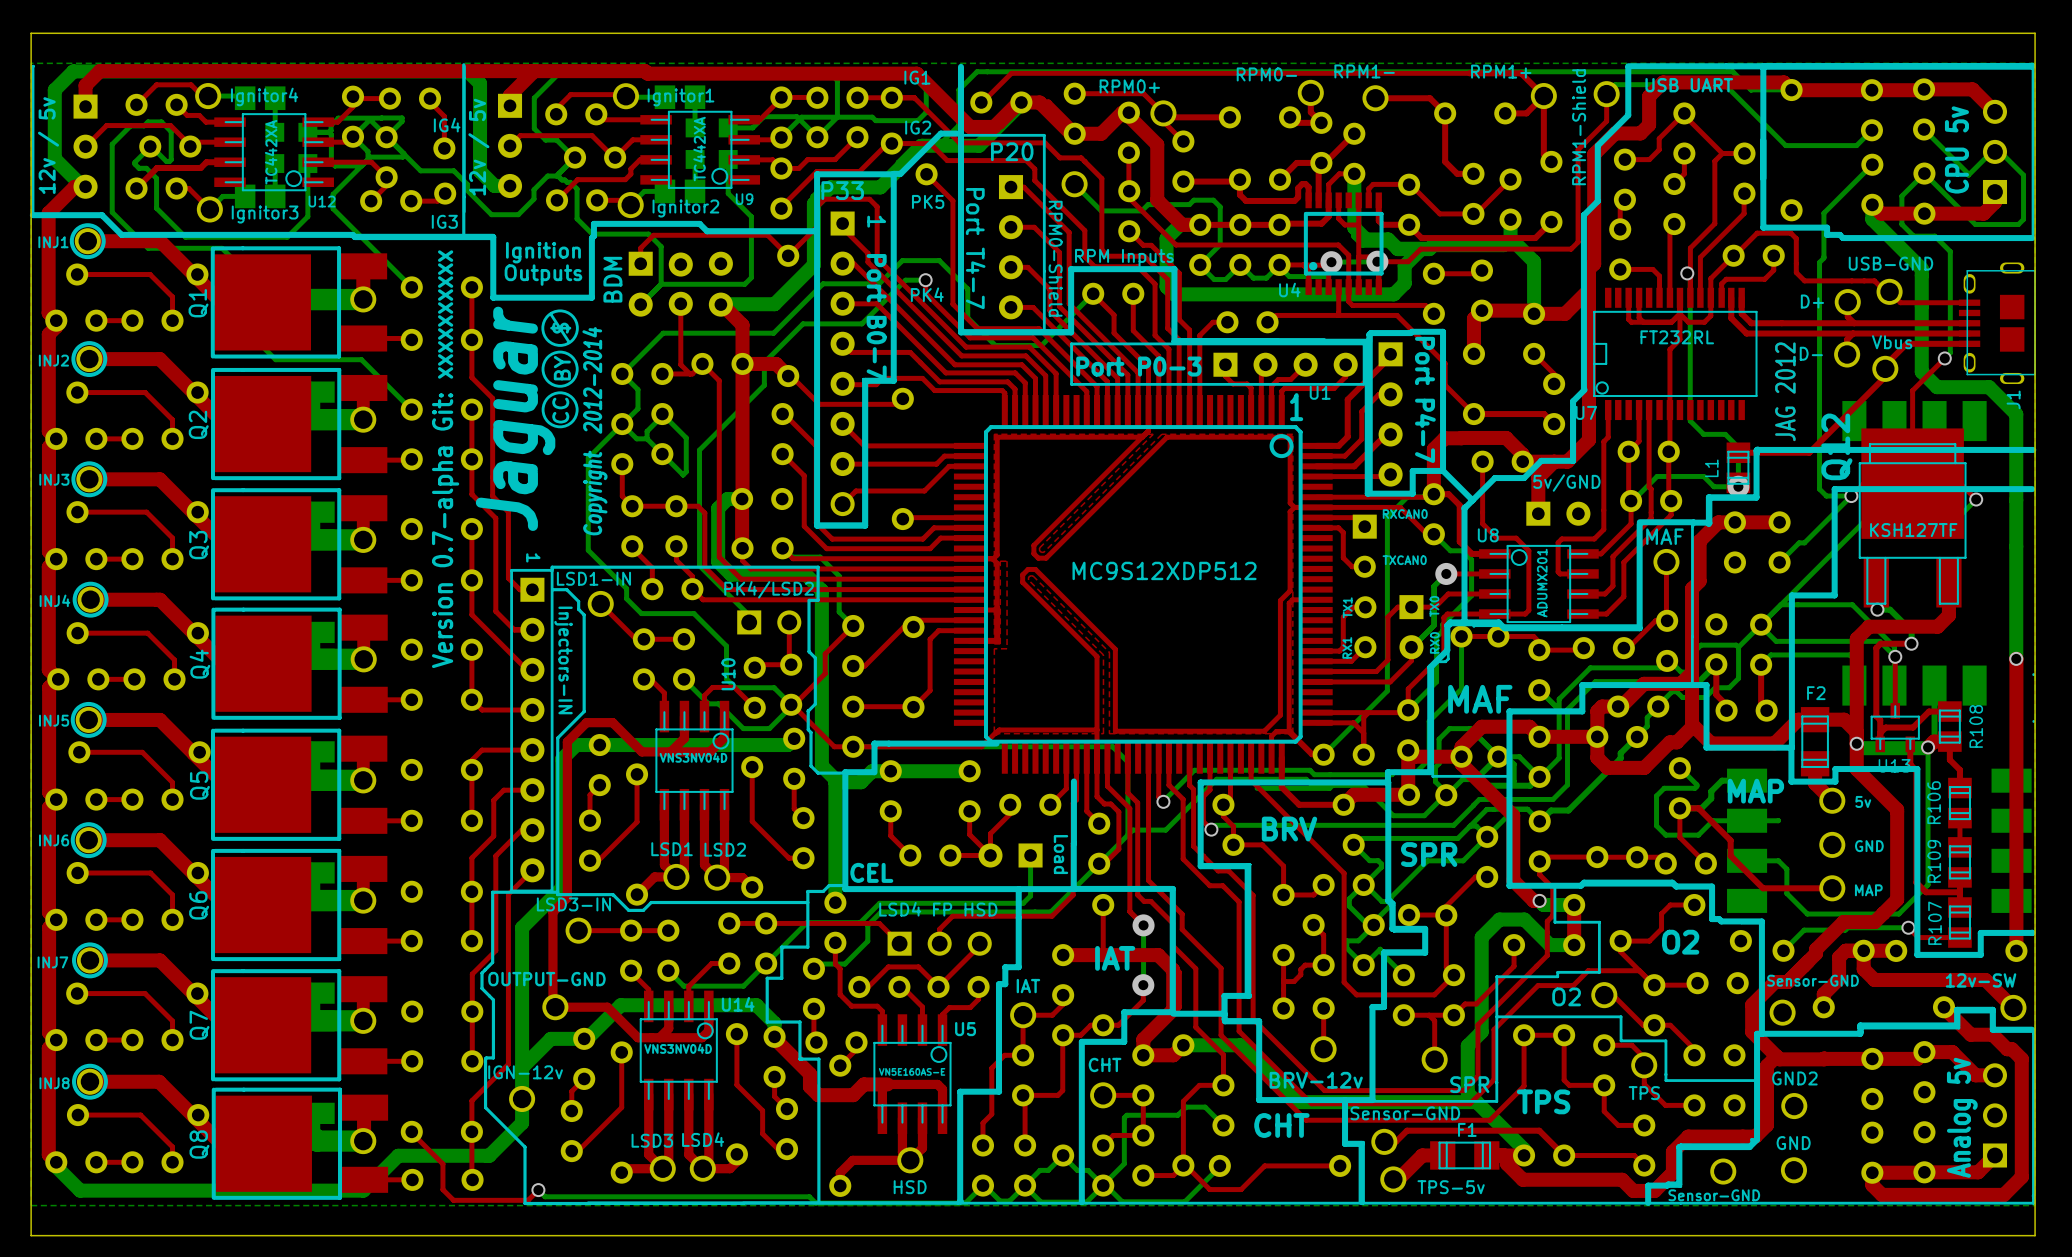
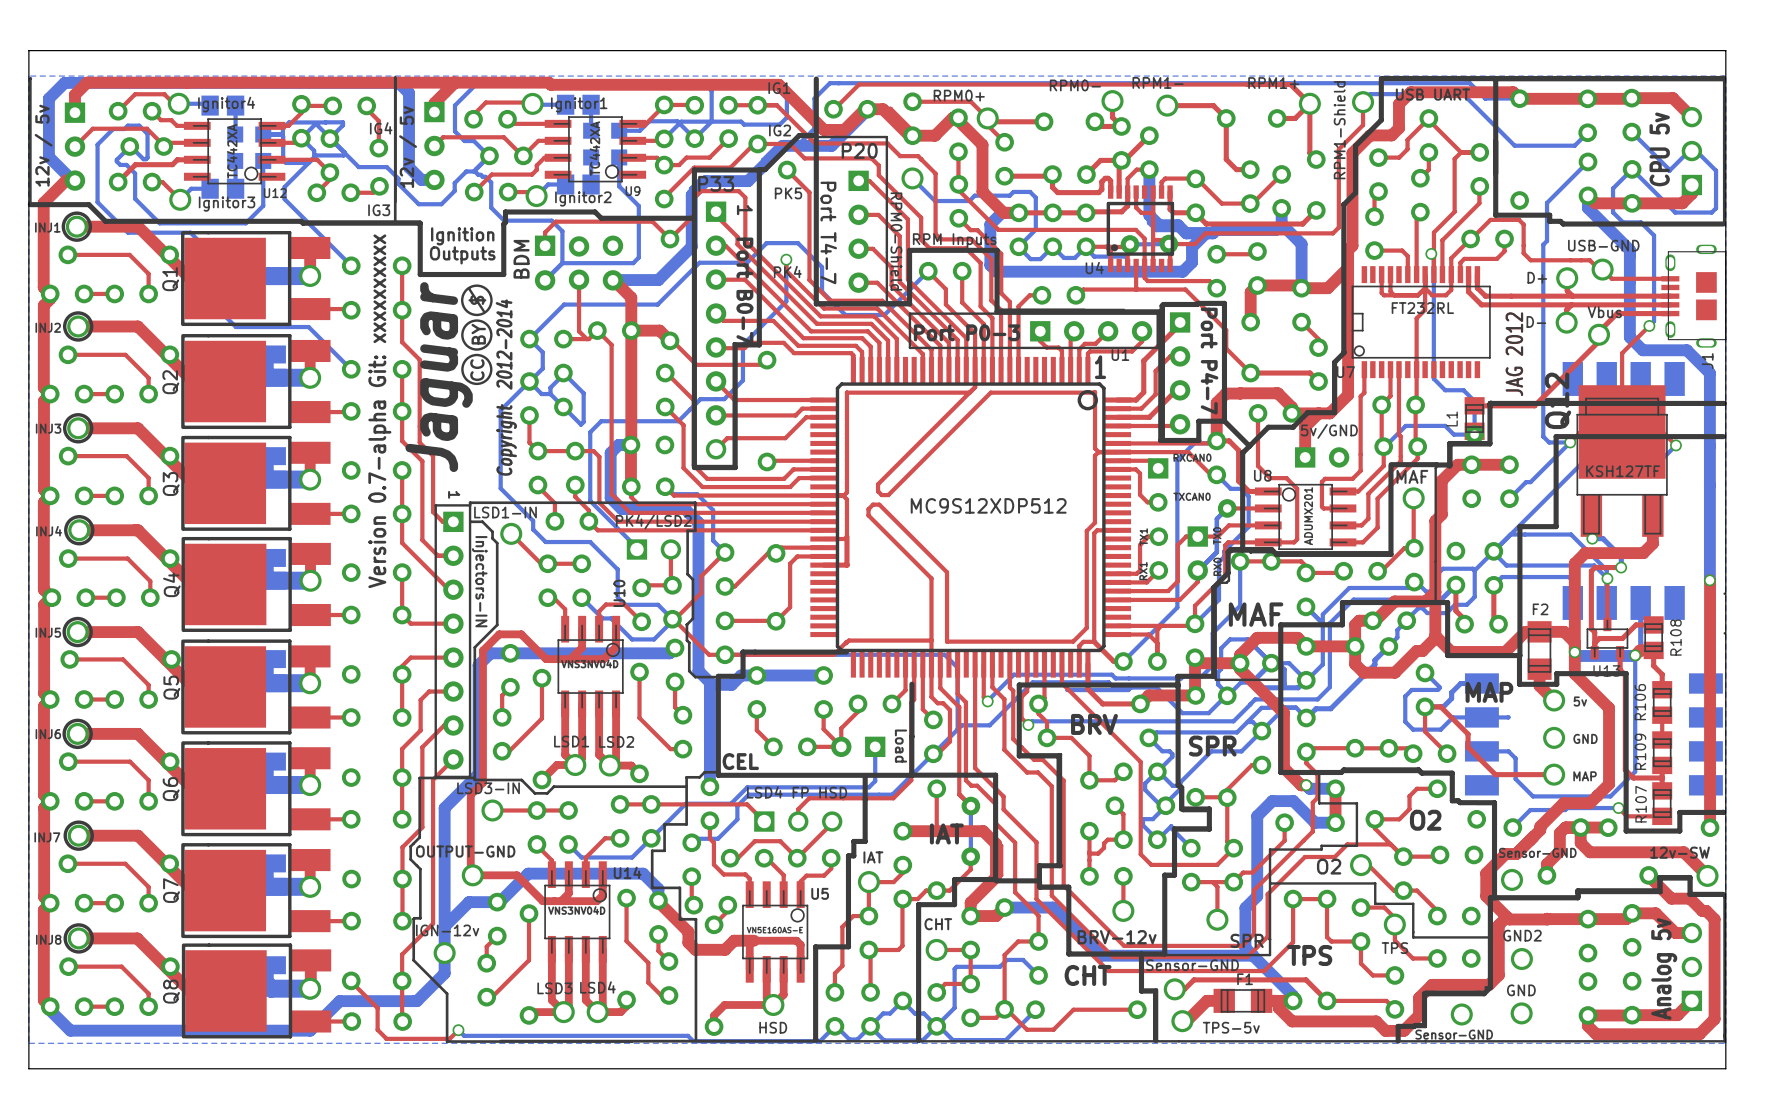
bottom track: (925, 280) (905, 280) (861, 323) (803, 323) (764, 362) (764, 385) (699, 450) (699, 565) (749, 615) (749, 620) -> (786, 259) (786, 301) (742, 344) (742, 380) (724, 399) (700, 399) (678, 421) (601, 421) (590, 432) (590, 500) (636, 547)
top zone outline: (994, 434) (1153, 434) (1039, 547) (1041, 552) (1043, 552) (1161, 434) (1292, 434) (1292, 733) (1109, 733) (1109, 652) (1032, 575) (1030, 575) (1028, 580) (1103, 654) (1103, 733) (994, 733) (994, 648) (1007, 648) (1007, 561) (1000, 561) (1000, 643) (994, 643) (994, 434) -> none

